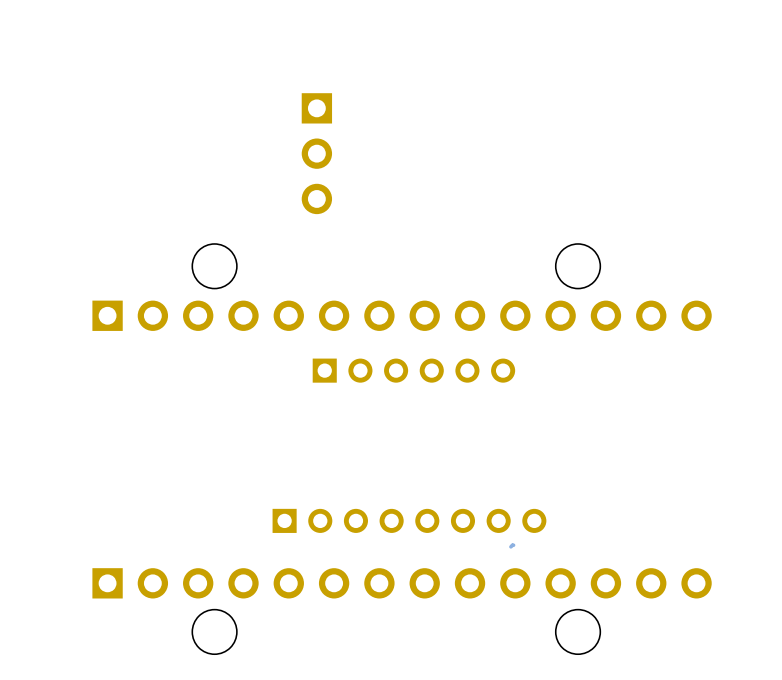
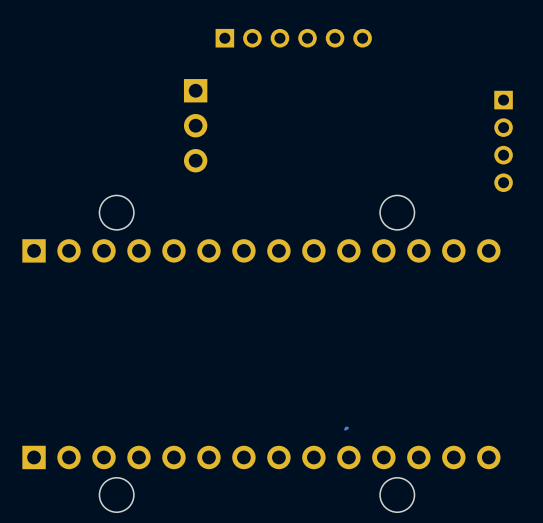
part: none -> (503, 141)
part position: (413, 370) -> (293, 38)
part: (409, 520) -> none

